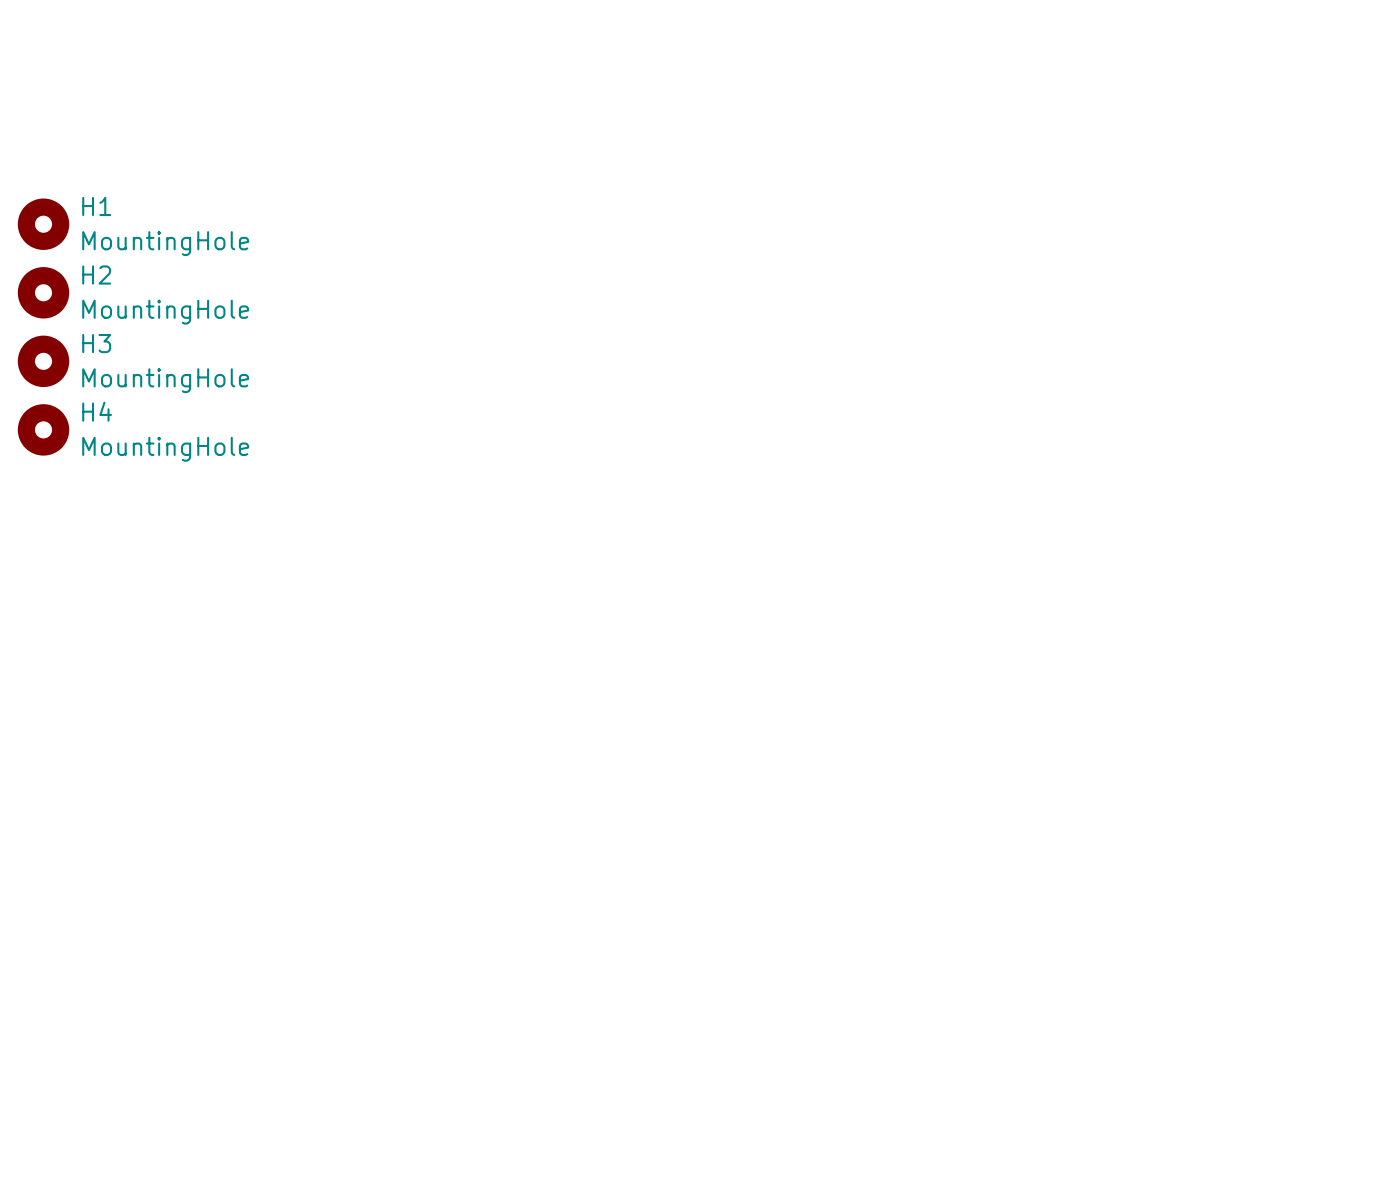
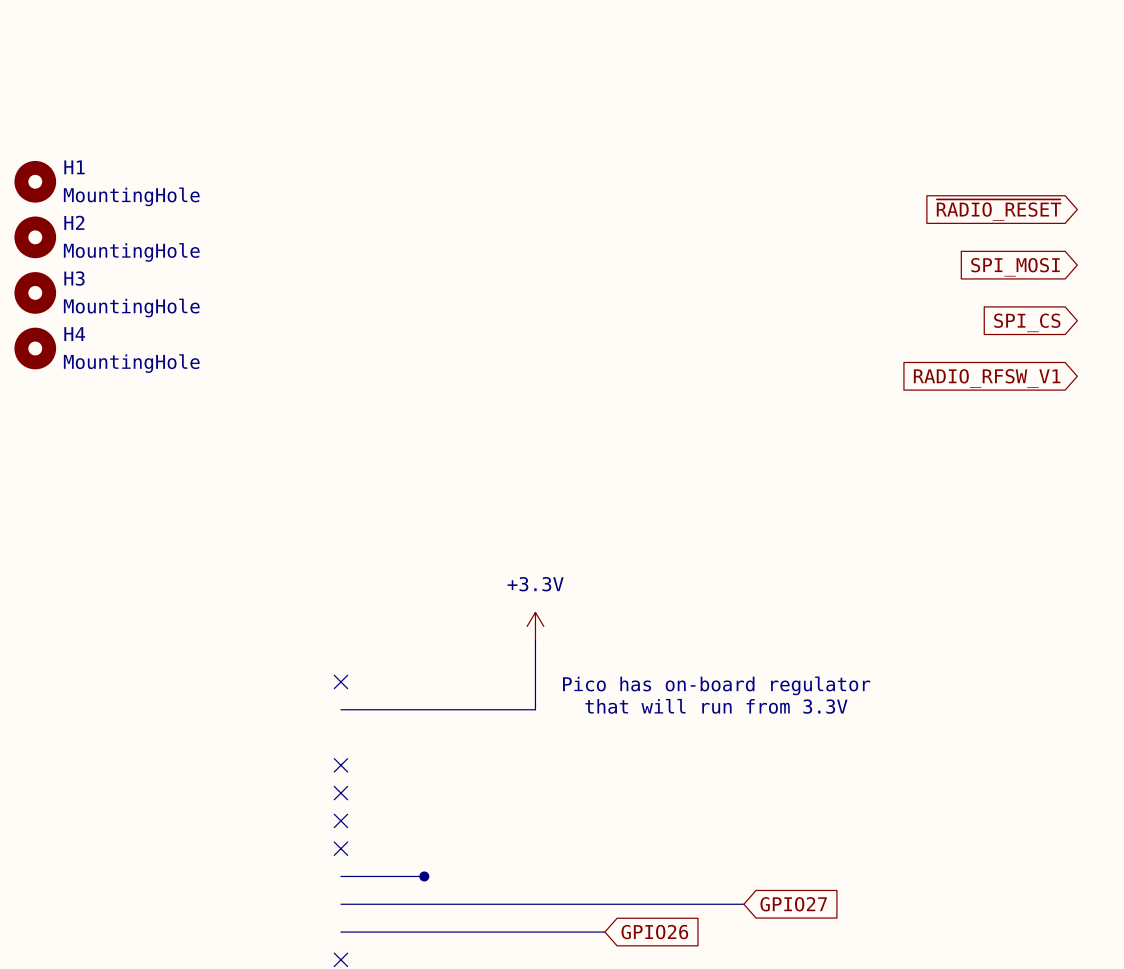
global label: none -> ~{RADIO_RESET} (999, 210)
global label: none -> SPI_MOSI (1015, 267)
global label: none -> SPI_CS (1027, 322)
global label: none -> RADIO_RFSW_V1 (987, 378)
power symbol: none -> +3.3V (535, 626)
wire: none -> (535, 640) (535, 709) (340, 709)
no-connect mark: none -> (340, 681)
text: none -> Pico has on-board regulator (716, 685)
text: none -> that will run from 3.3V (716, 706)
no-connect mark: none -> (340, 765)
no-connect mark: none -> (340, 793)
no-connect mark: none -> (340, 820)
no-connect mark: none -> (340, 848)
wire: none -> (340, 876) (424, 876)
junction: none -> (424, 876)
wire: none -> (340, 904) (743, 904)
global label: none -> GPIO27 (793, 904)
wire: none -> (340, 932) (604, 932)
global label: none -> GPIO26 (654, 932)
no-connect mark: none -> (340, 959)

